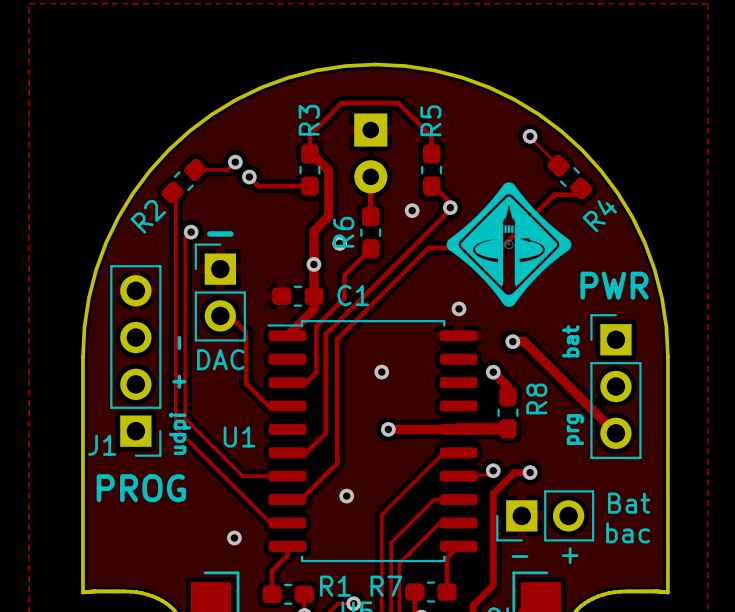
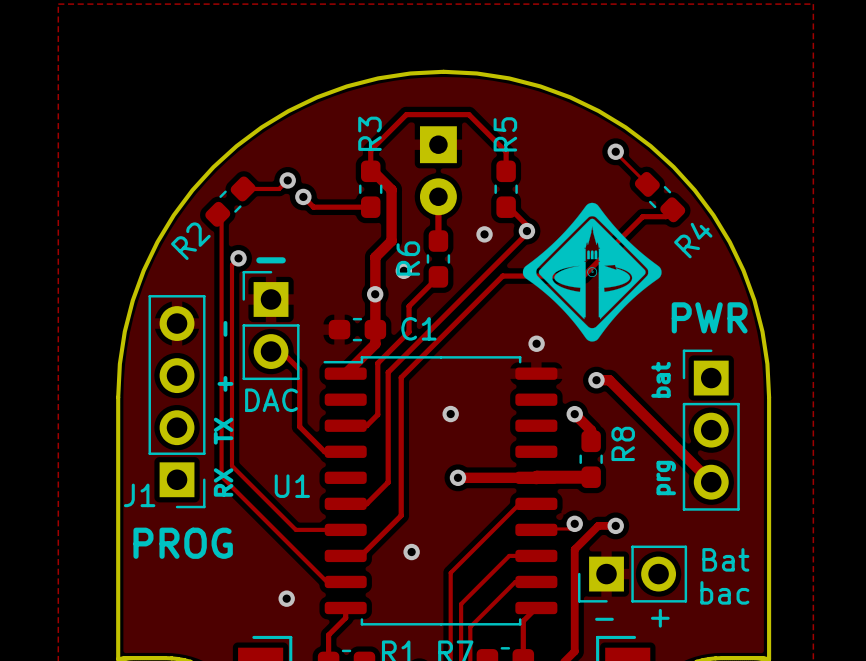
text: none -> RX TX + - (223, 408)
text: udpi + - (180, 395) -> none

